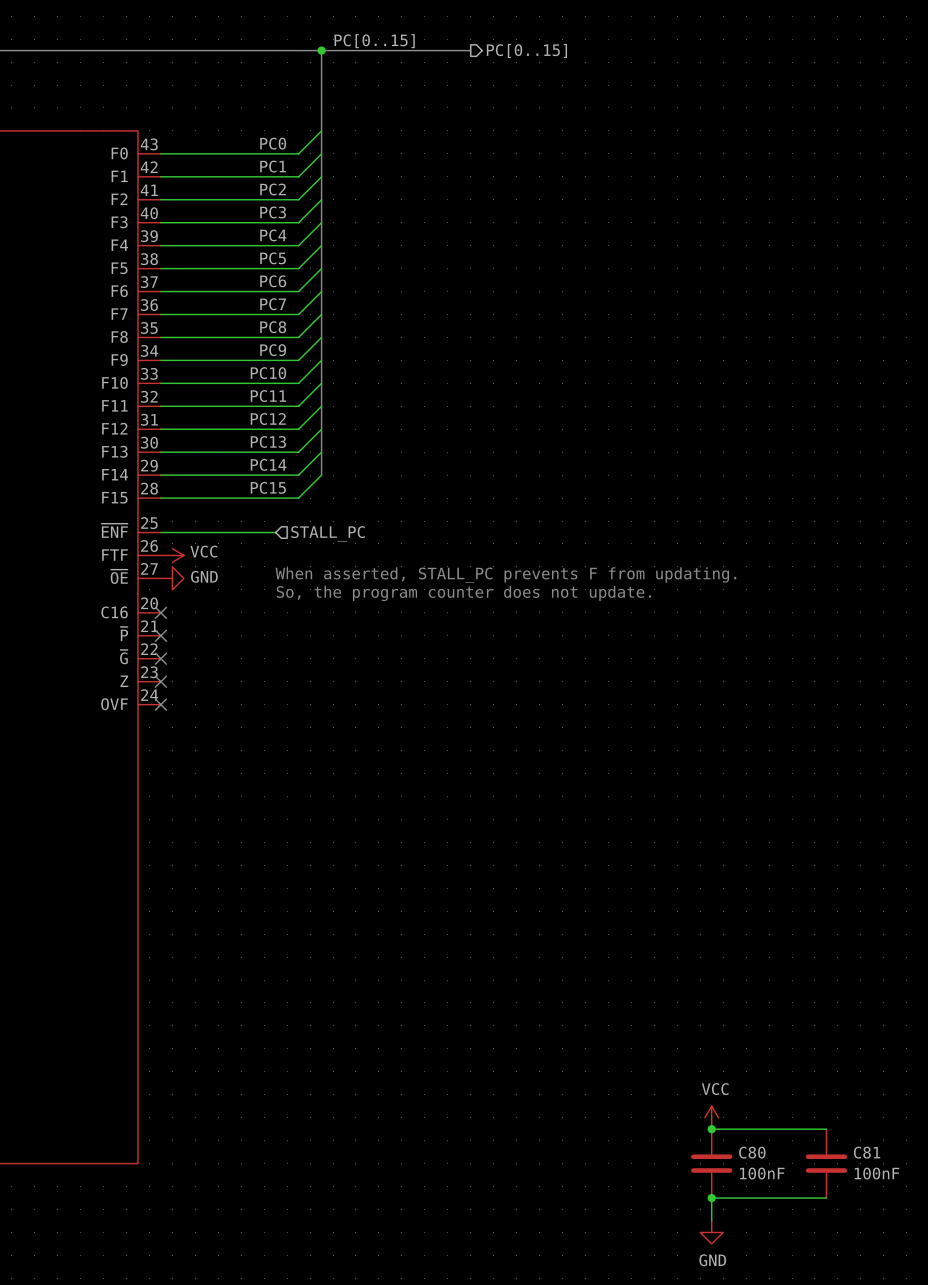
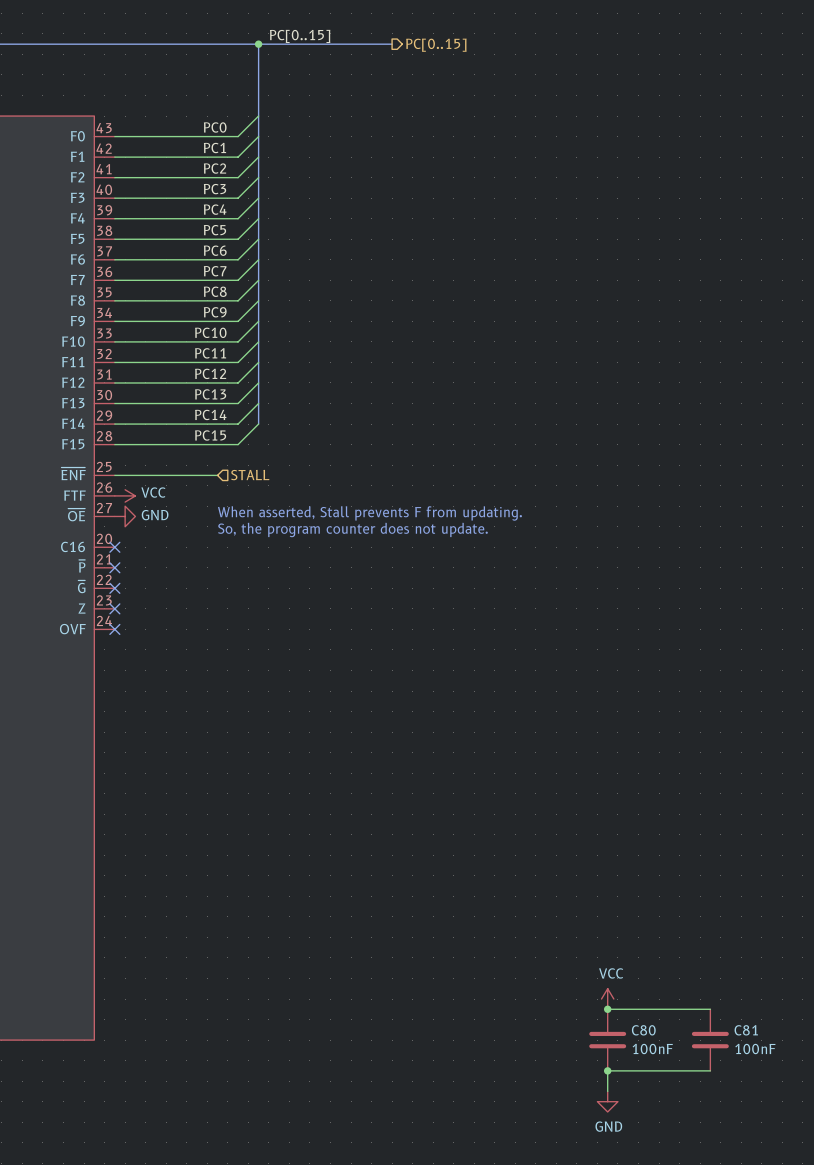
hierarchical label: STALL_PC (328, 533) -> STALL (250, 475)
text: When asserted, STALL_PC prevents F from updating. (505, 575) -> When asserted, Stall prevents F from updating. (369, 513)

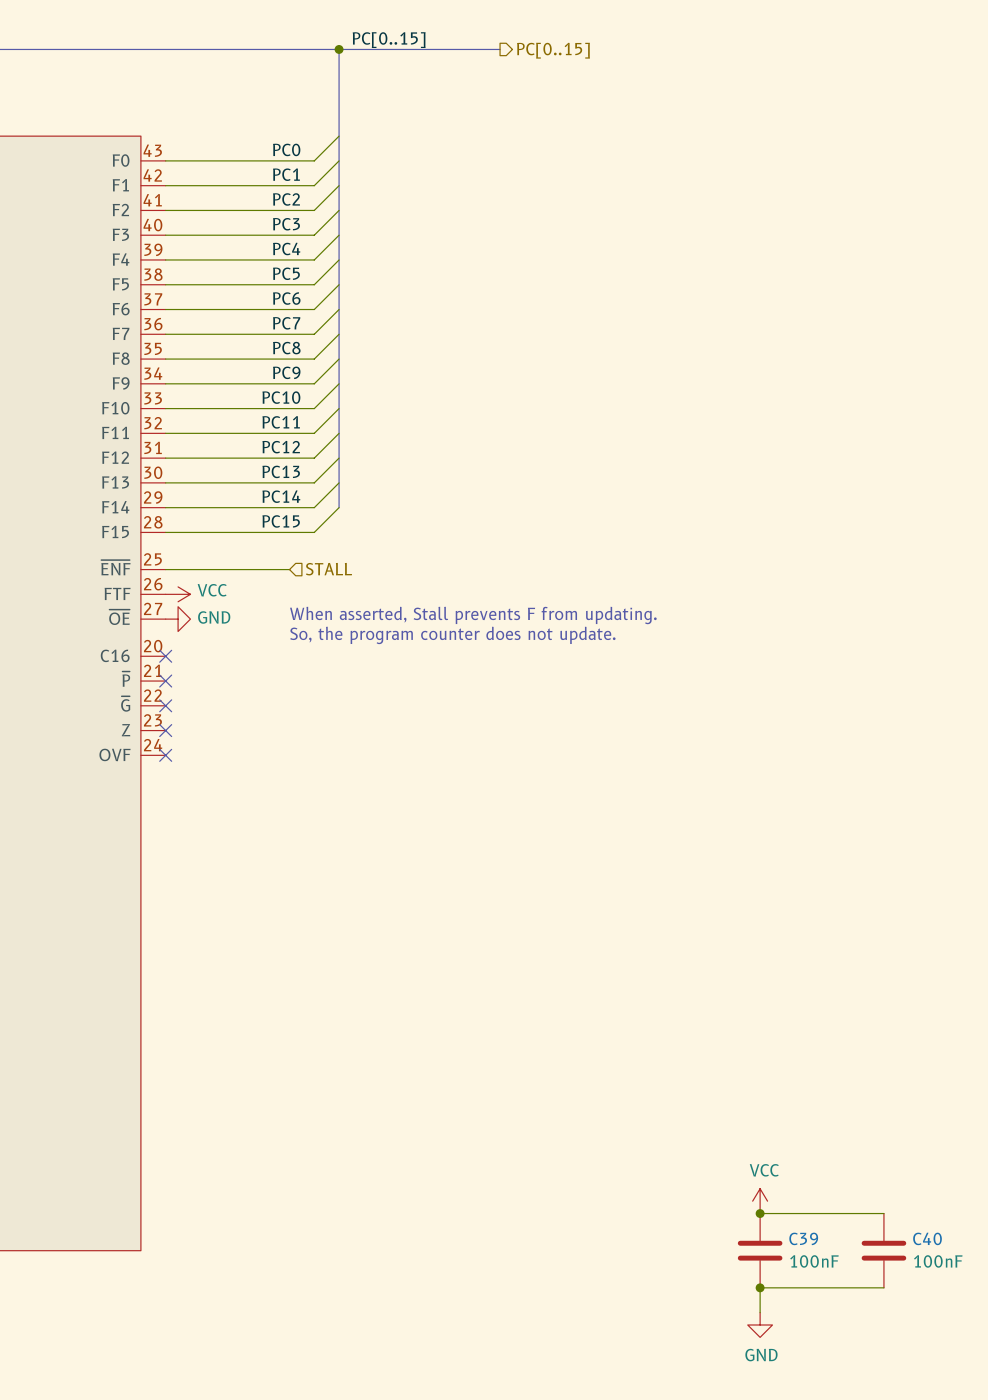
C80 name: C80 (643, 1030) -> C39 (803, 1238)
C81 name: C81 (746, 1030) -> C40 (927, 1238)

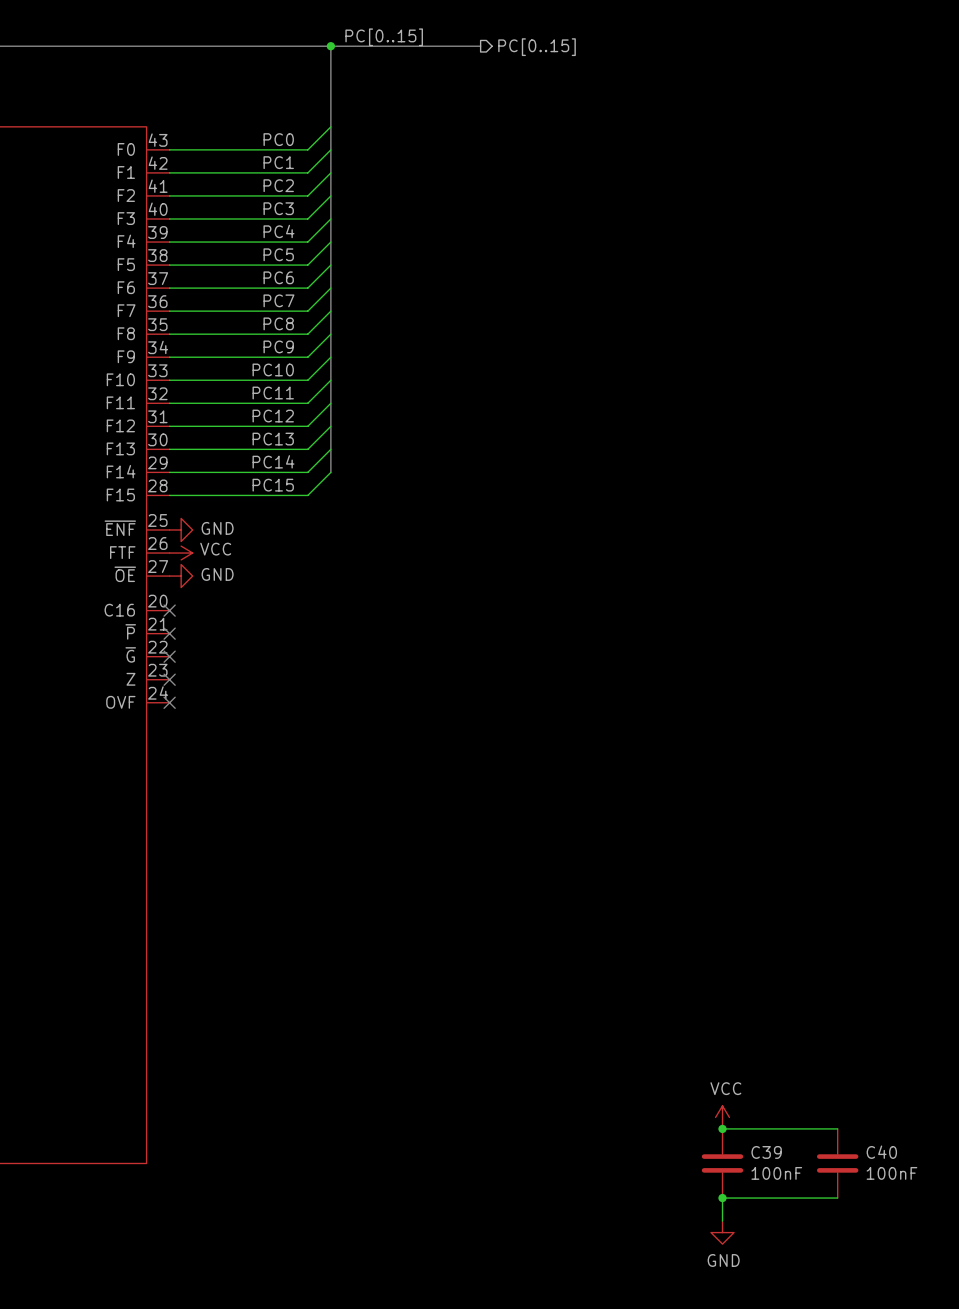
wire: (165, 569) (289, 569) -> none
power symbol: none -> GND (181, 529)
hierarchical label: STALL (328, 569) -> none
text: When asserted, Stall prevents F from updating. (473, 615) -> none
text: So, the program counter does not update. (452, 635) -> none

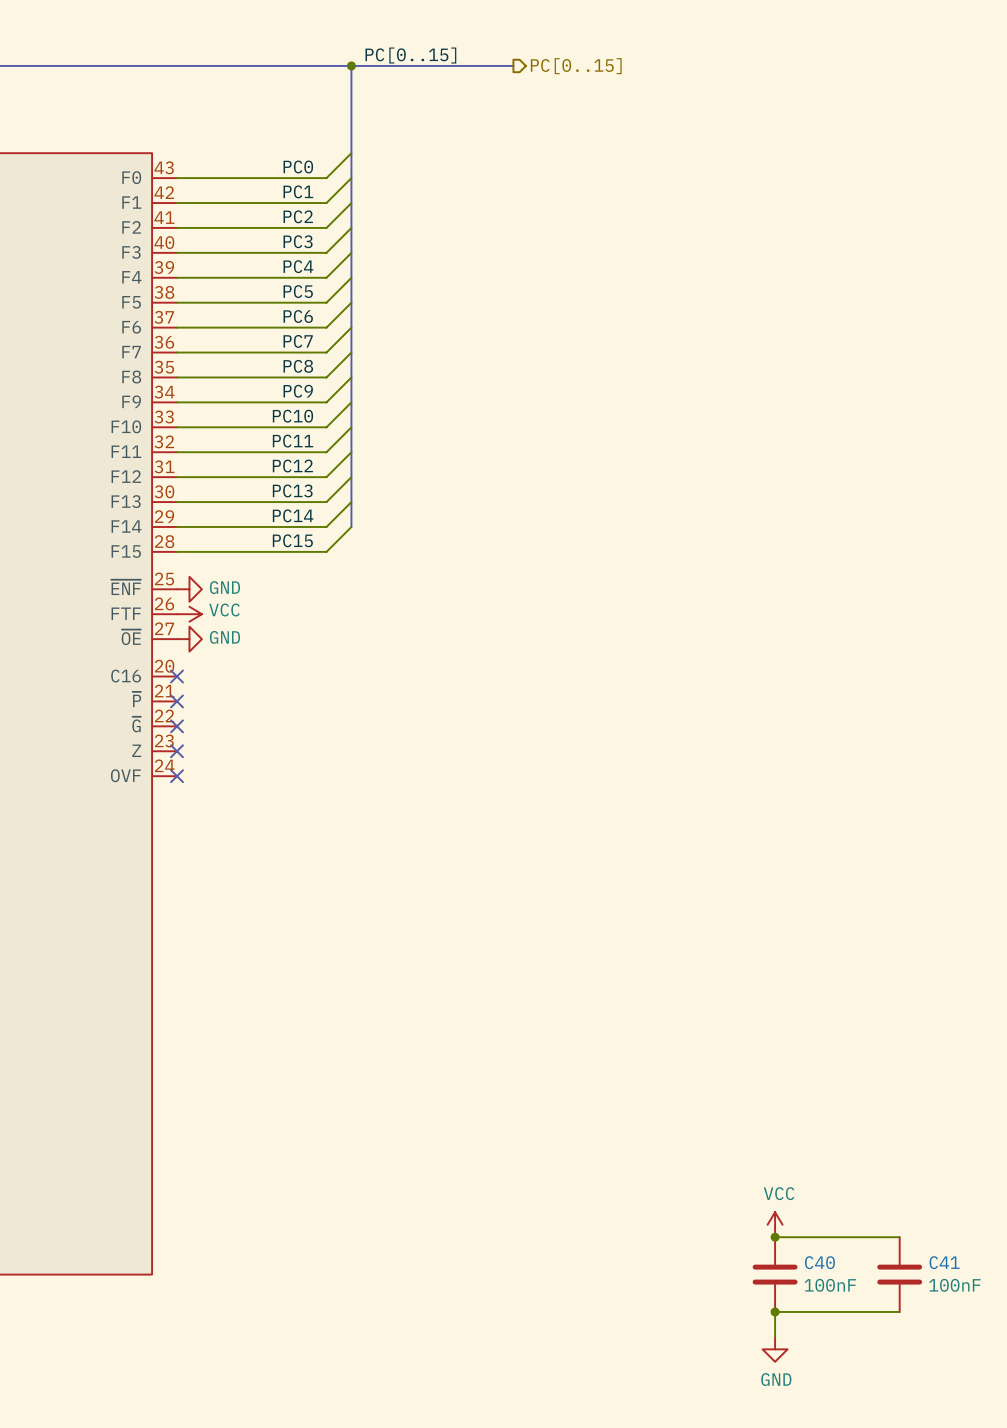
C39 name: C39 (766, 1152) -> C40 (819, 1262)
C40 name: C40 (881, 1152) -> C41 (944, 1262)

